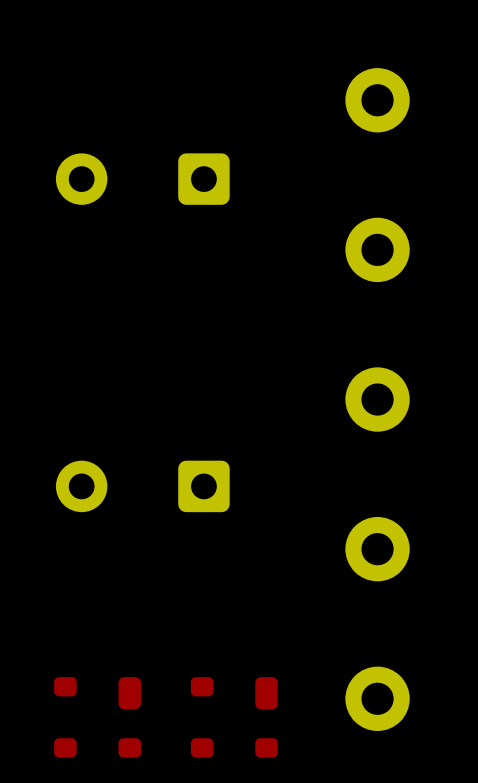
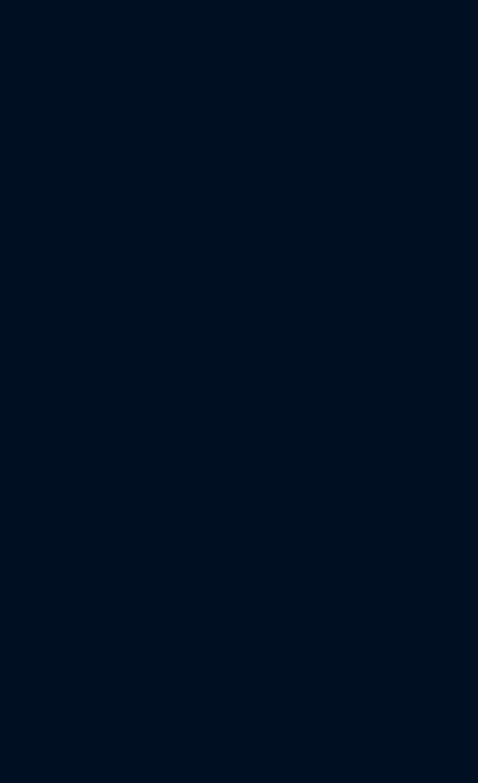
part: (377, 100) -> none
part: (142, 179) -> none
part: (377, 249) -> none
part: (377, 399) -> none
part: (142, 486) -> none
part: (377, 549) -> none
part: (377, 698) -> none
part: (97, 717) -> none
part: (234, 717) -> none

